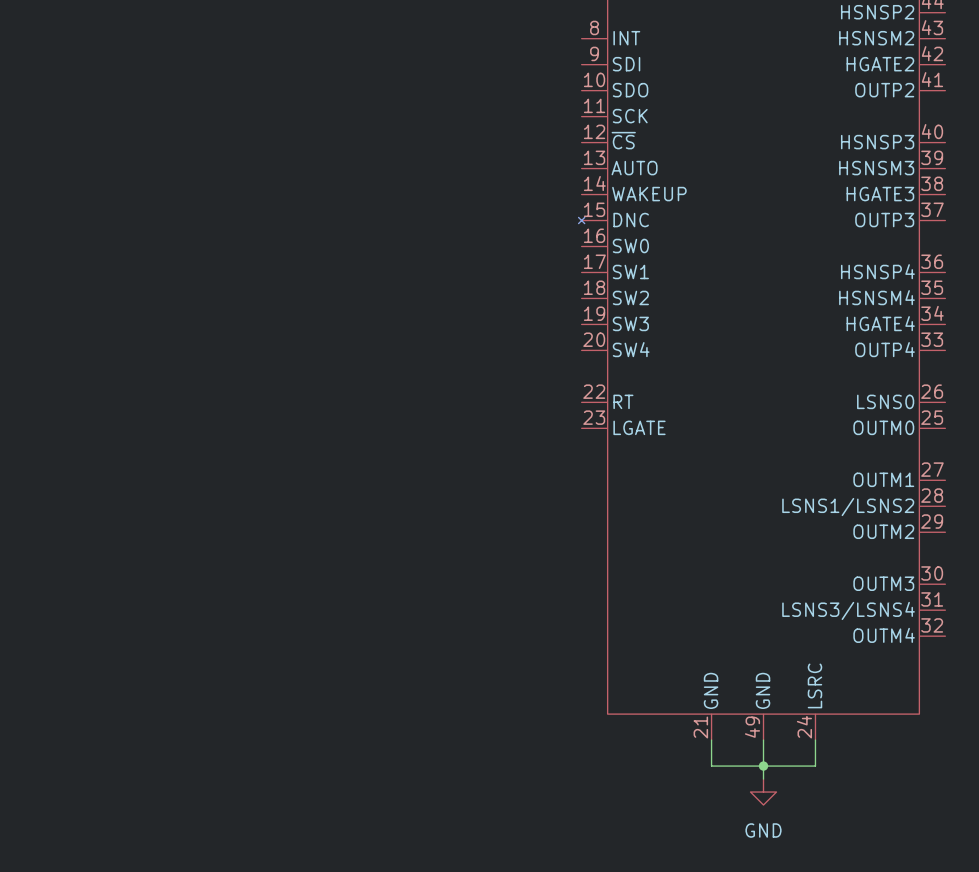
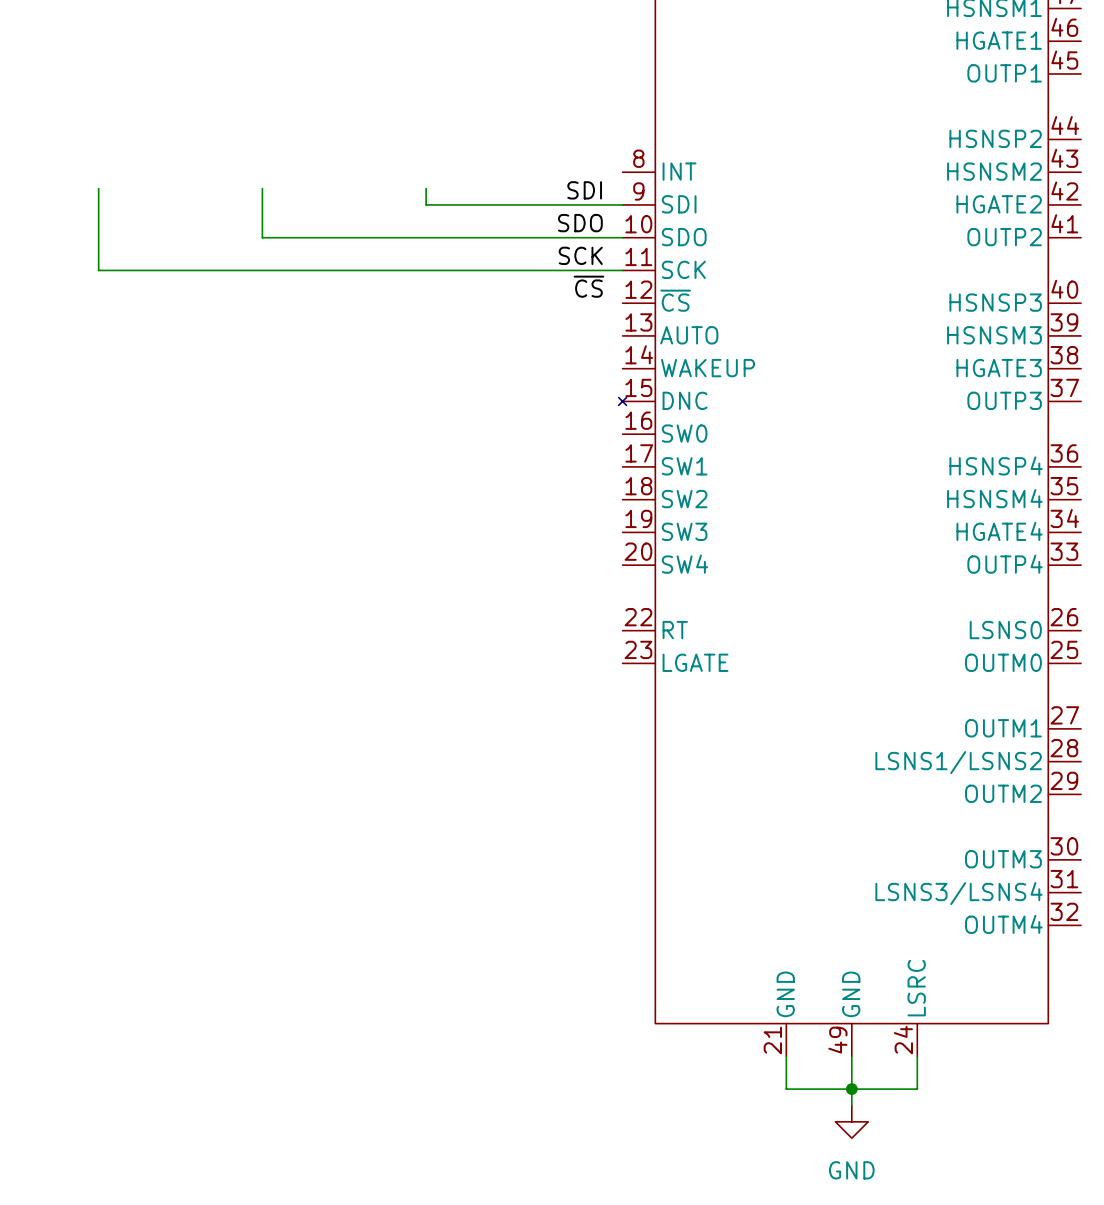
wire: none -> (98, 188) (98, 270) (622, 270)
wire: none -> (262, 188) (262, 237) (622, 237)
wire: none -> (426, 188) (426, 204) (622, 204)
label: none -> SDI (584, 190)
label: none -> SDO (580, 223)
label: none -> SCK (580, 255)
label: none -> ~{CS} (588, 286)

